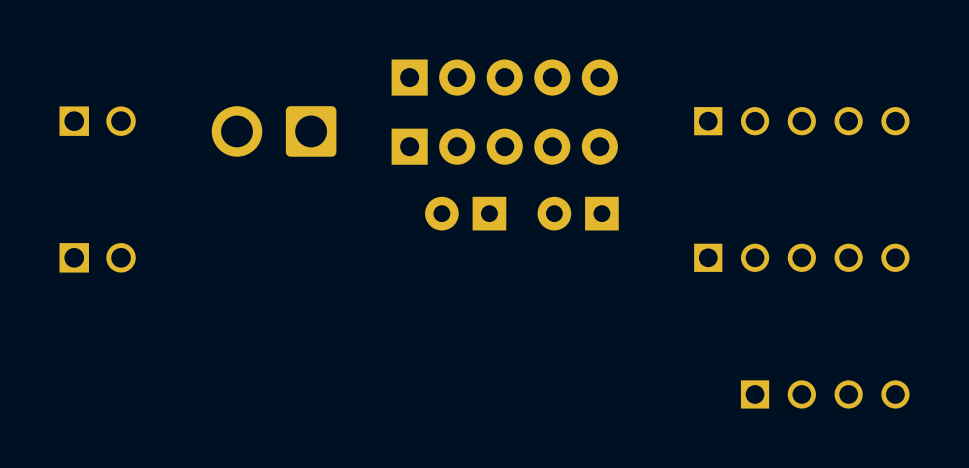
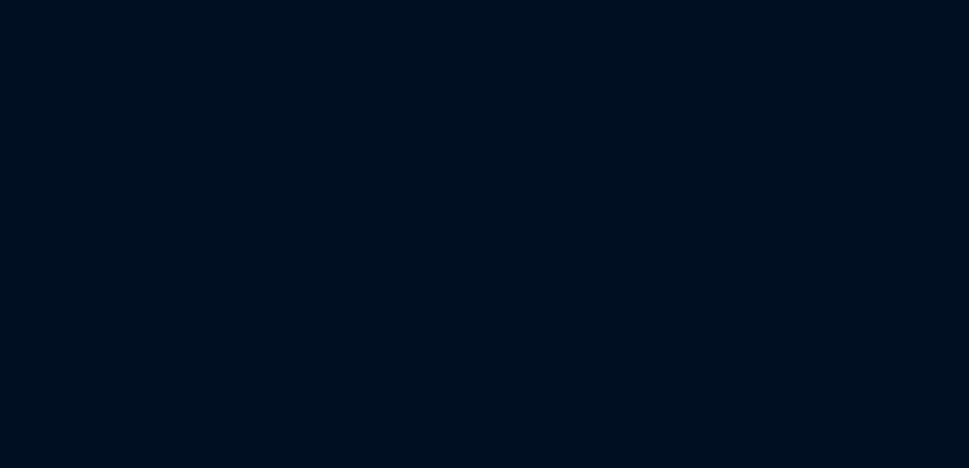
part: (504, 77) -> none
part: (97, 121) -> none
part: (801, 121) -> none
part: (274, 131) -> none
part: (504, 146) -> none
part: (465, 213) -> none
part: (578, 213) -> none
part: (97, 257) -> none
part: (801, 257) -> none
part: (825, 394) -> none

